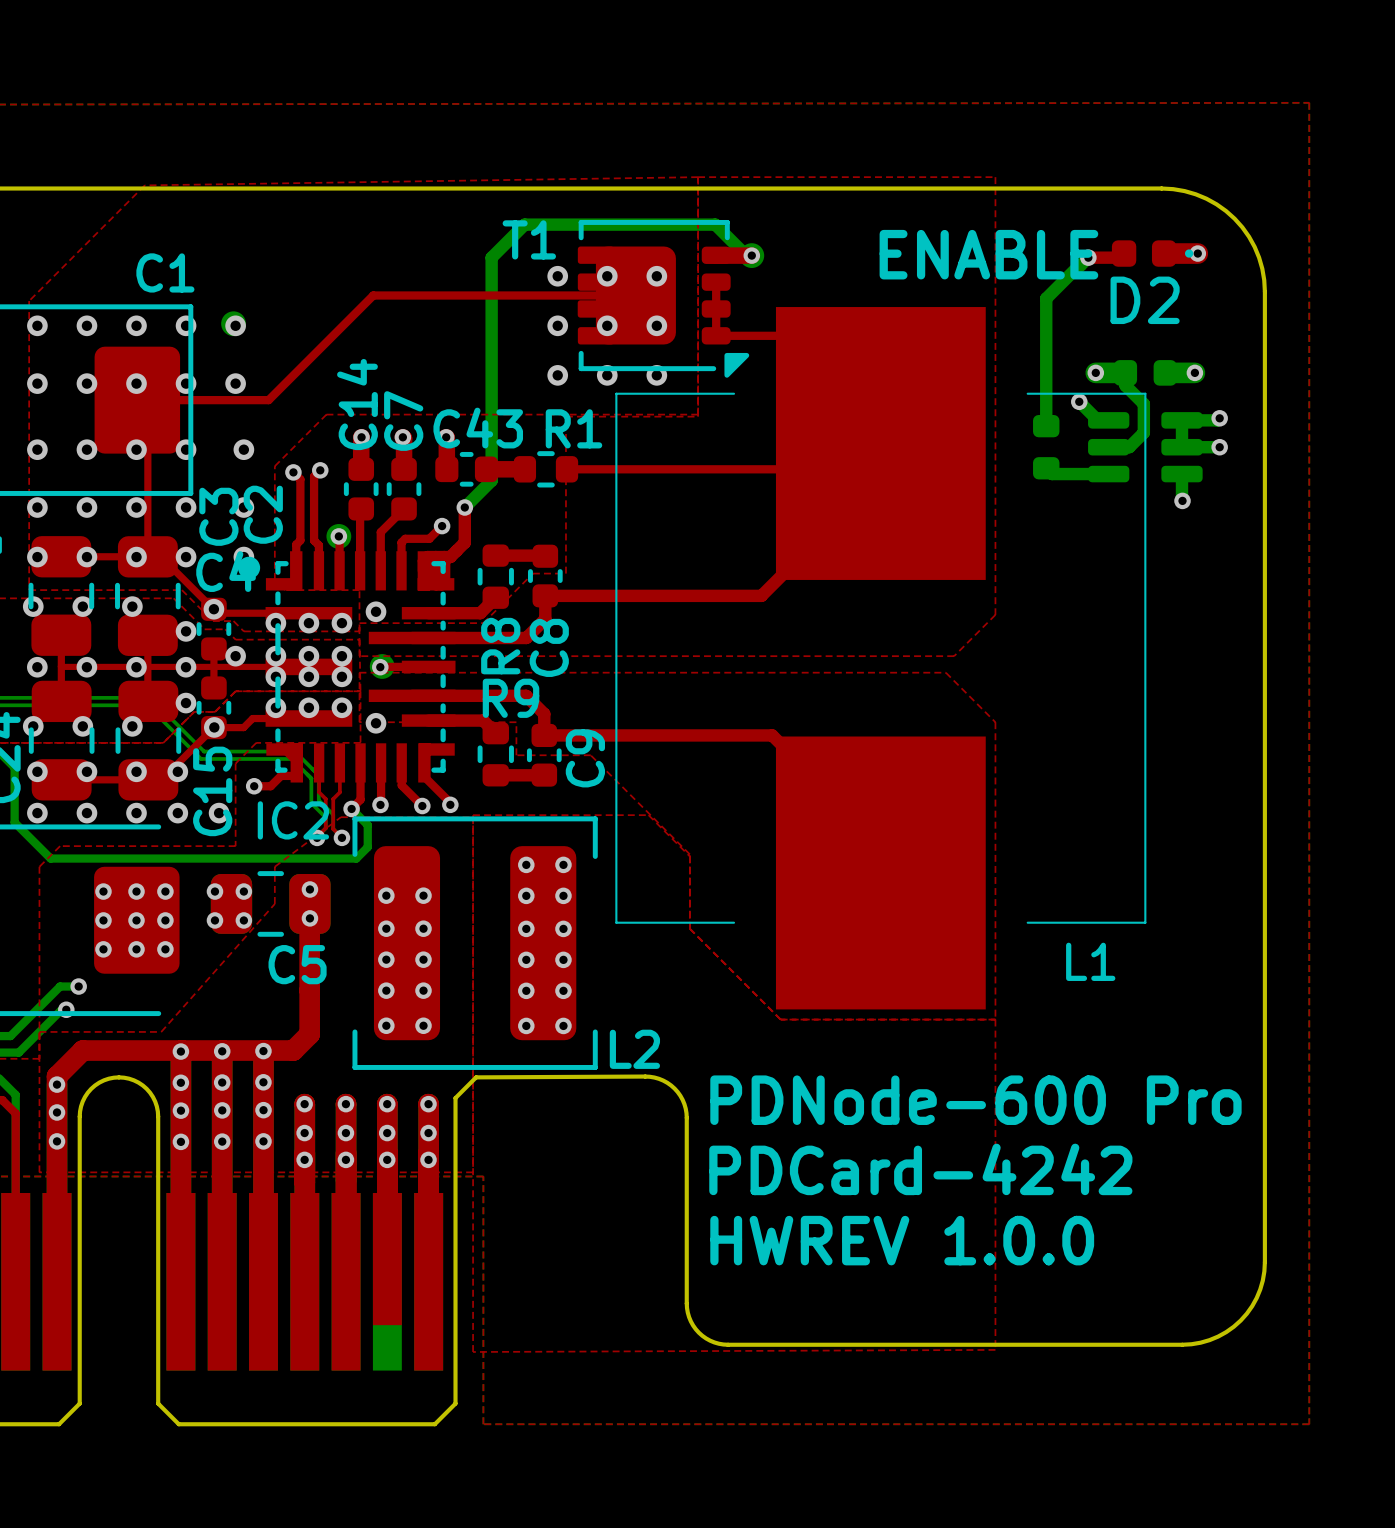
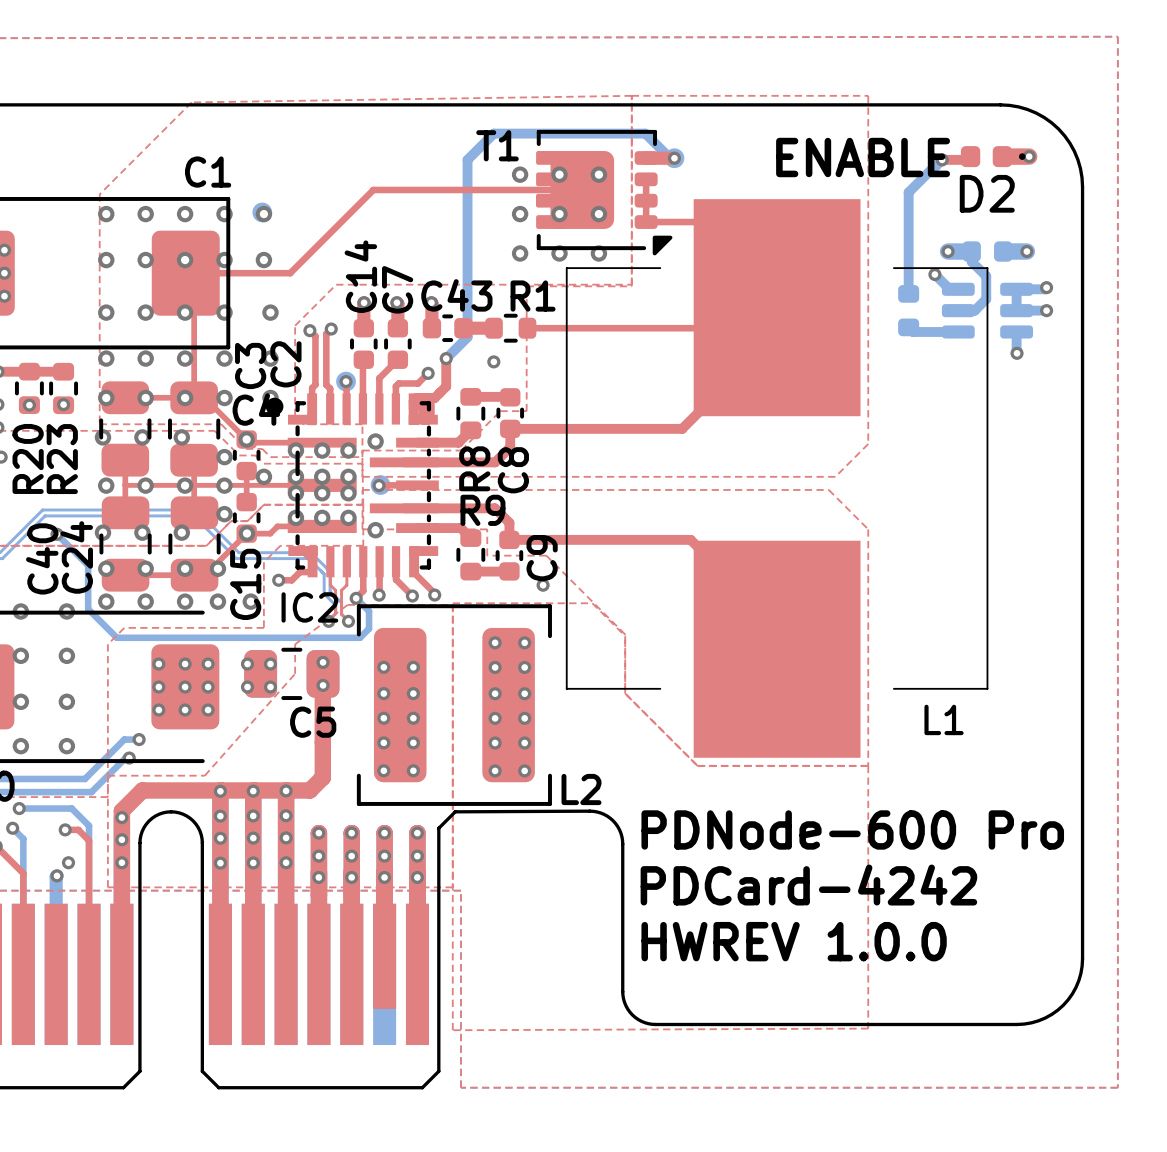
via: none -> (493, 361)
via: none -> (543, 585)

